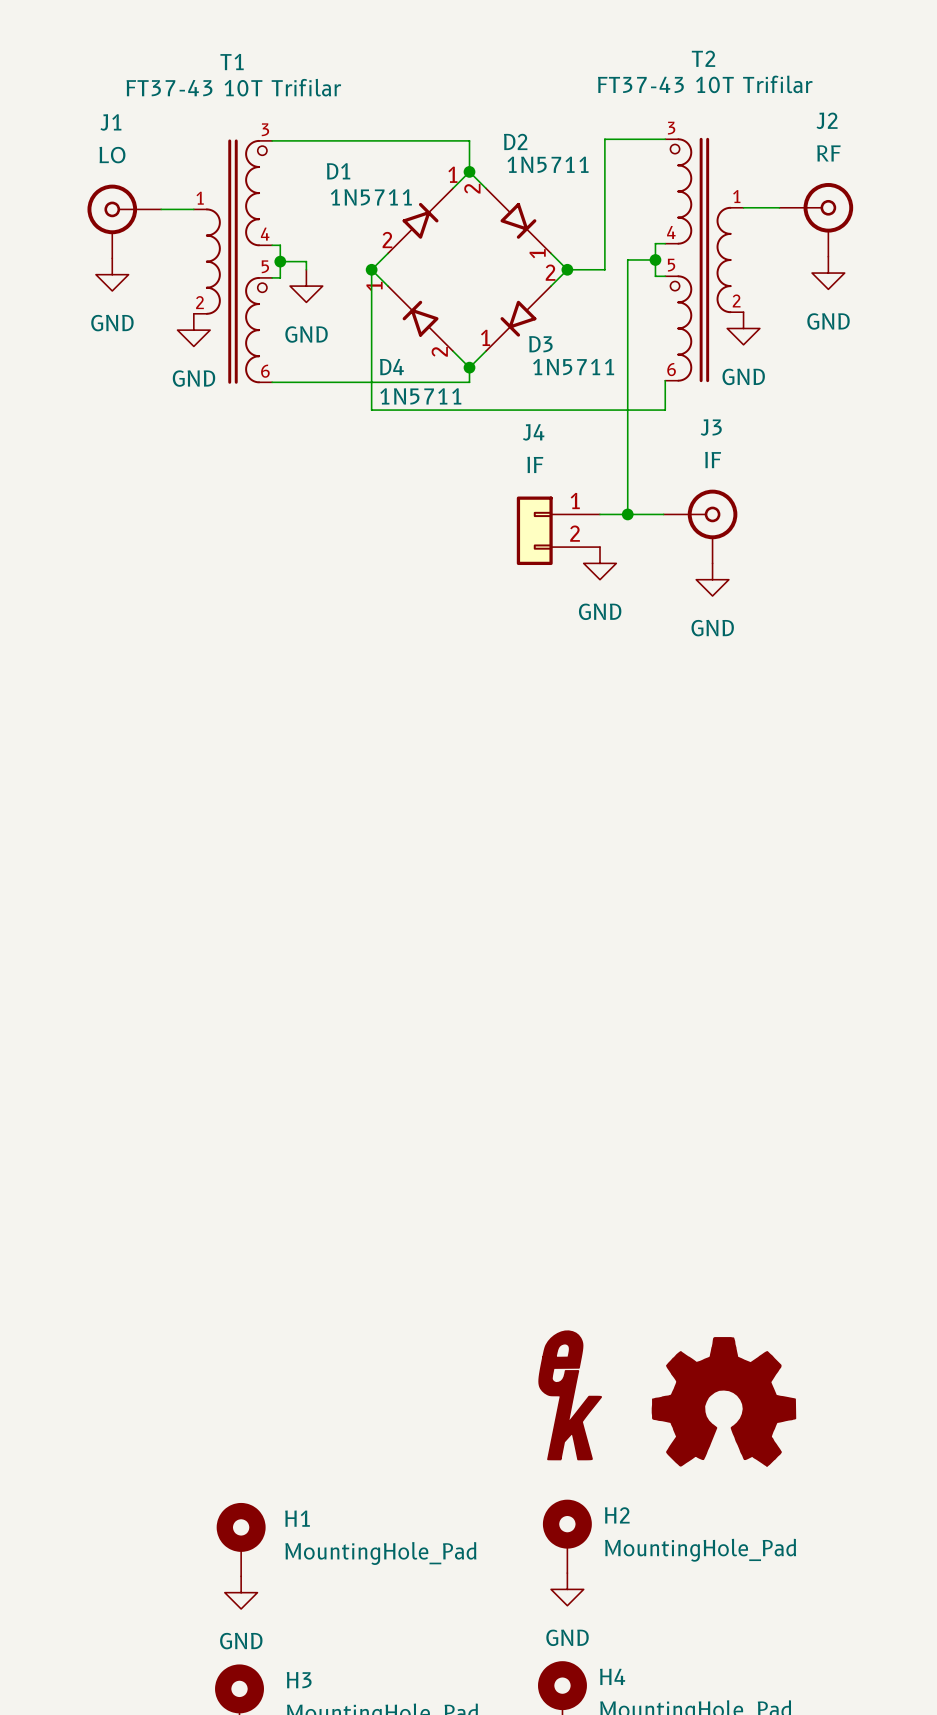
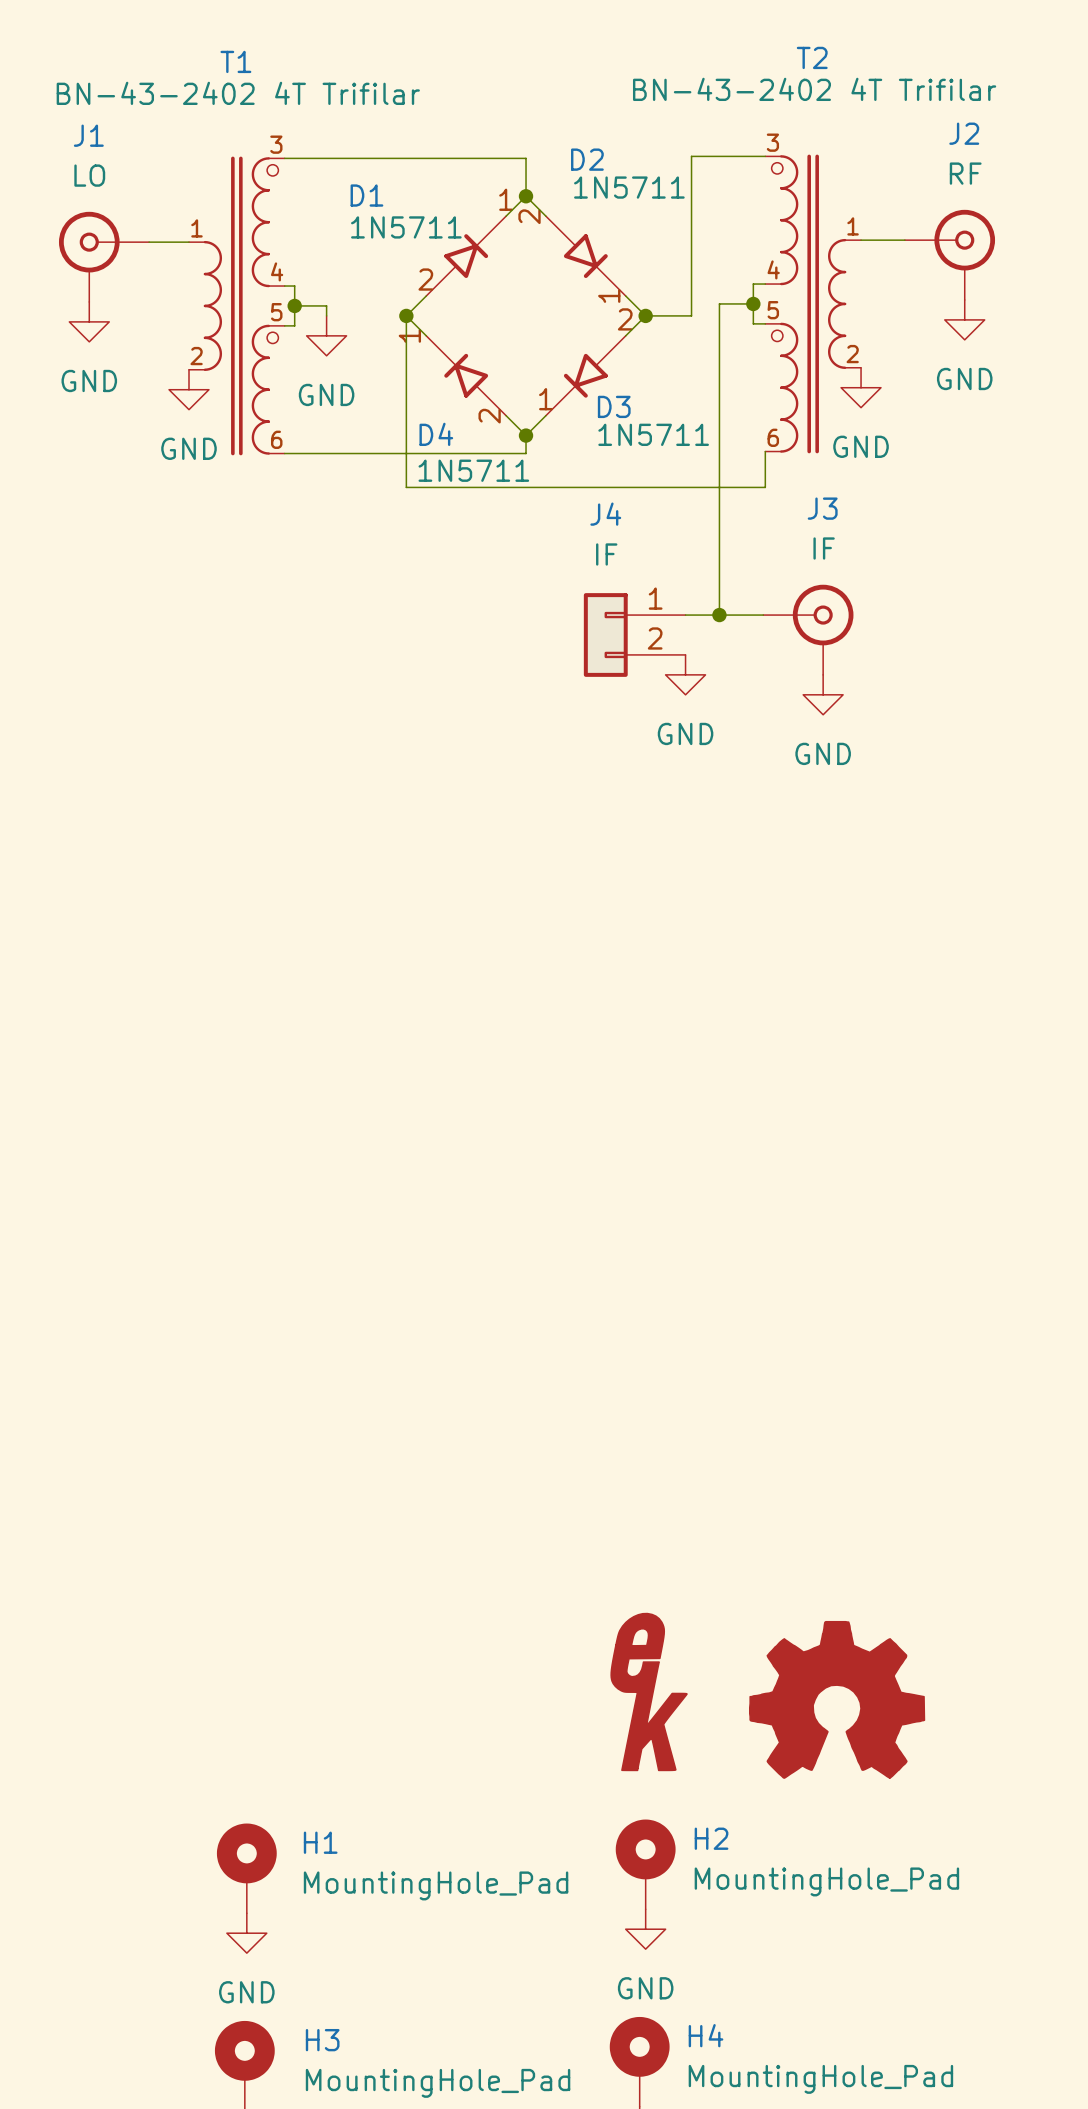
T2 value: FT37-43 10T Trifilar (705, 84) -> BN-43-2402 4T Trifilar (814, 89)
T1 value: FT37-43 10T Trifilar (233, 87) -> BN-43-2402 4T Trifilar (238, 93)

